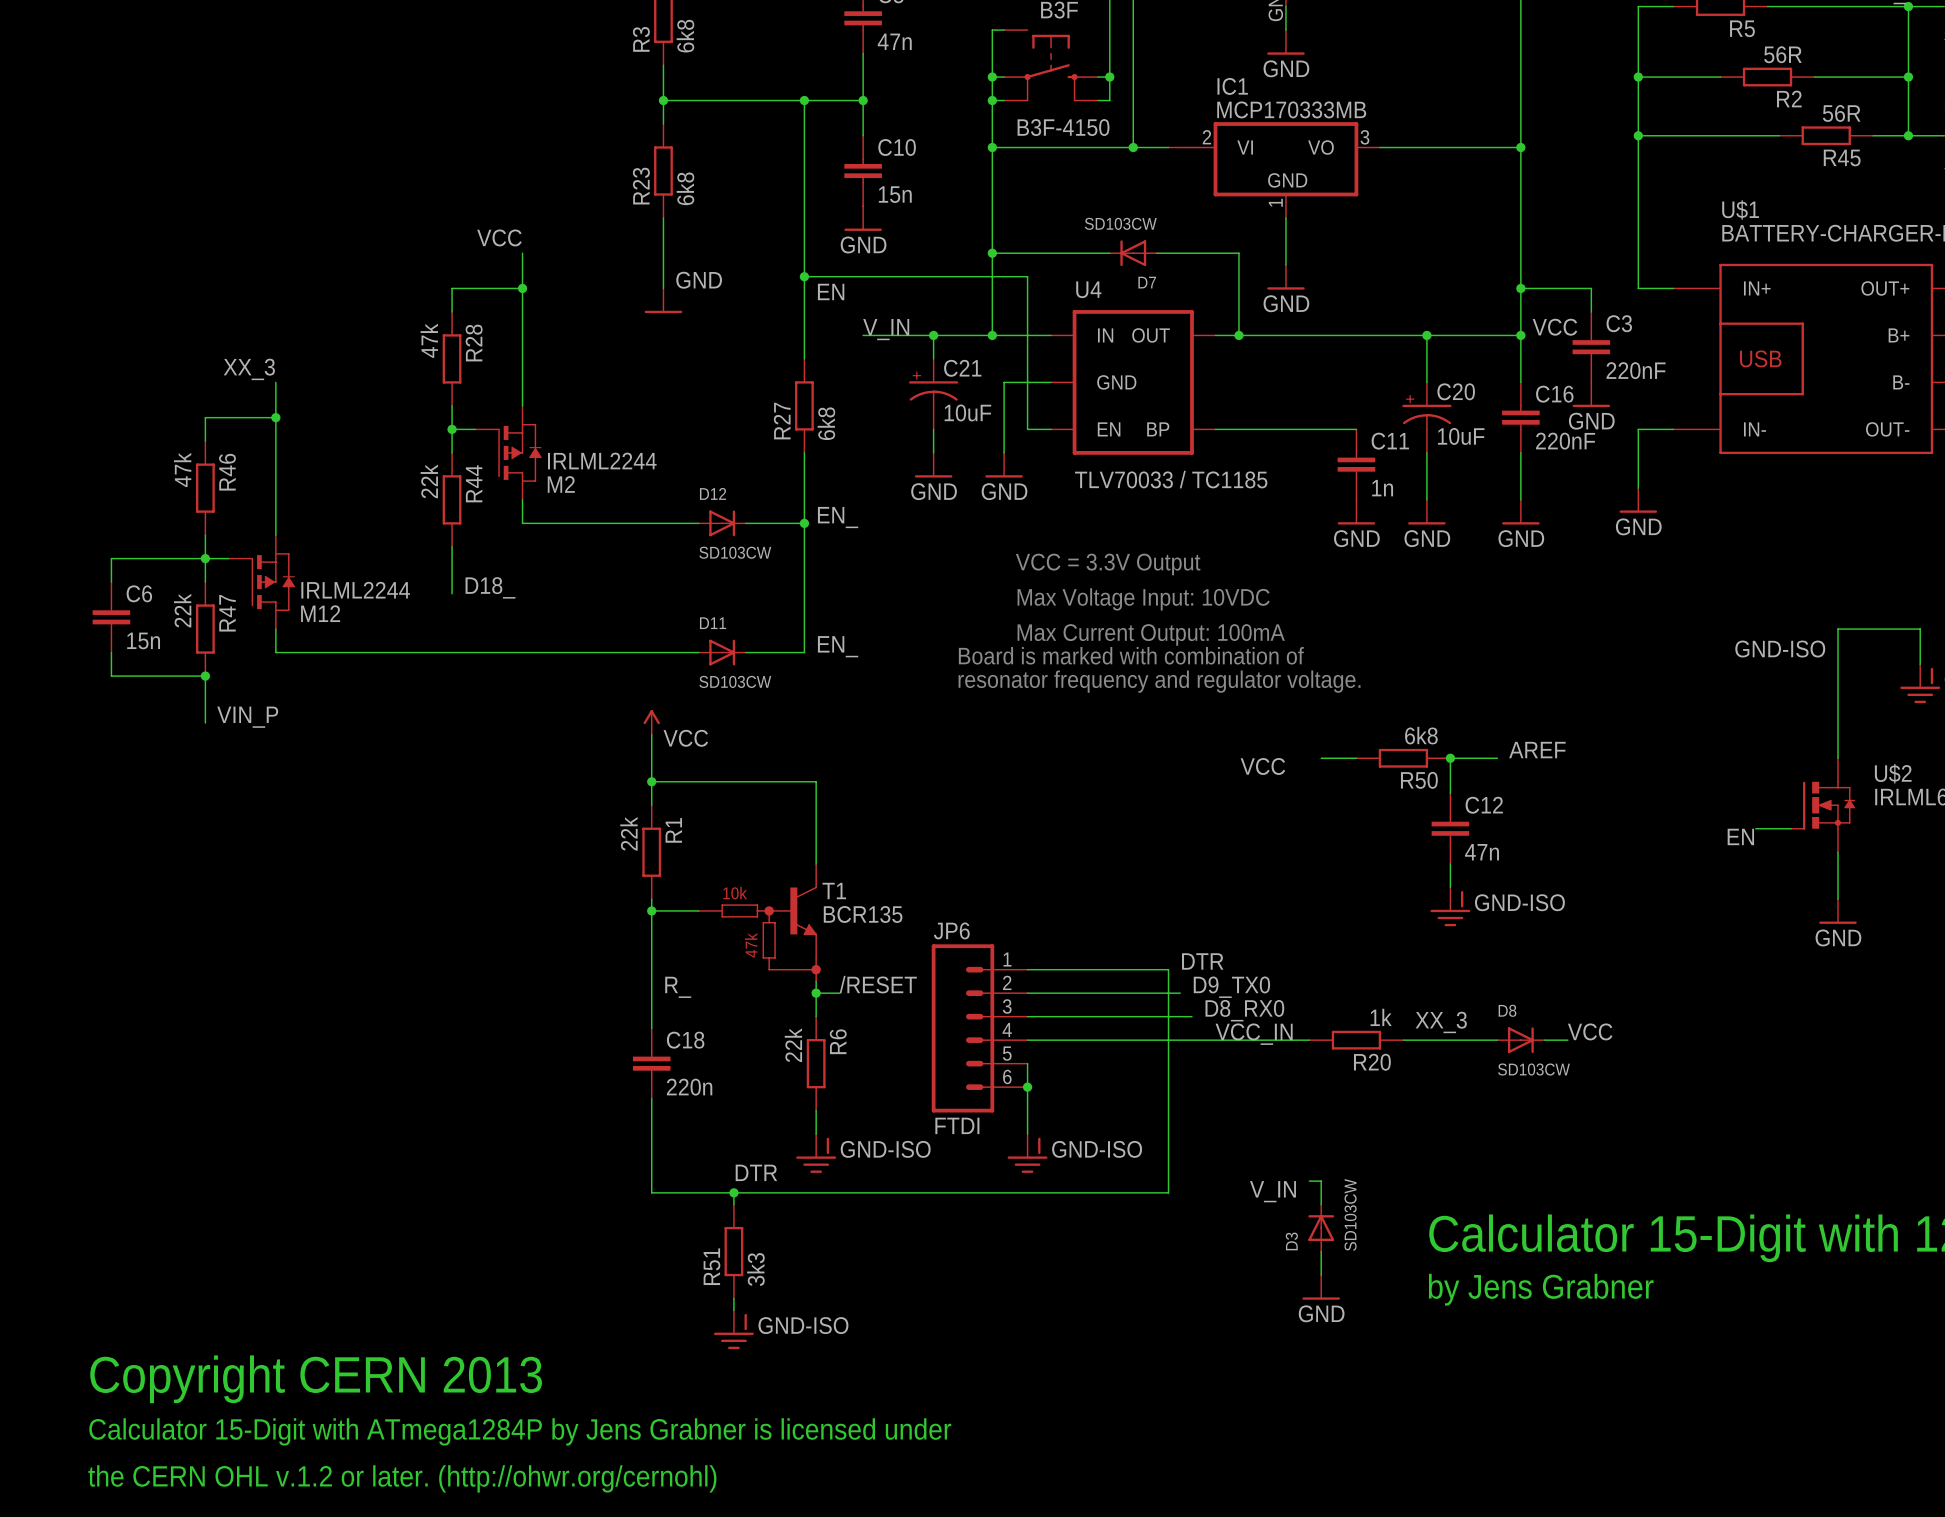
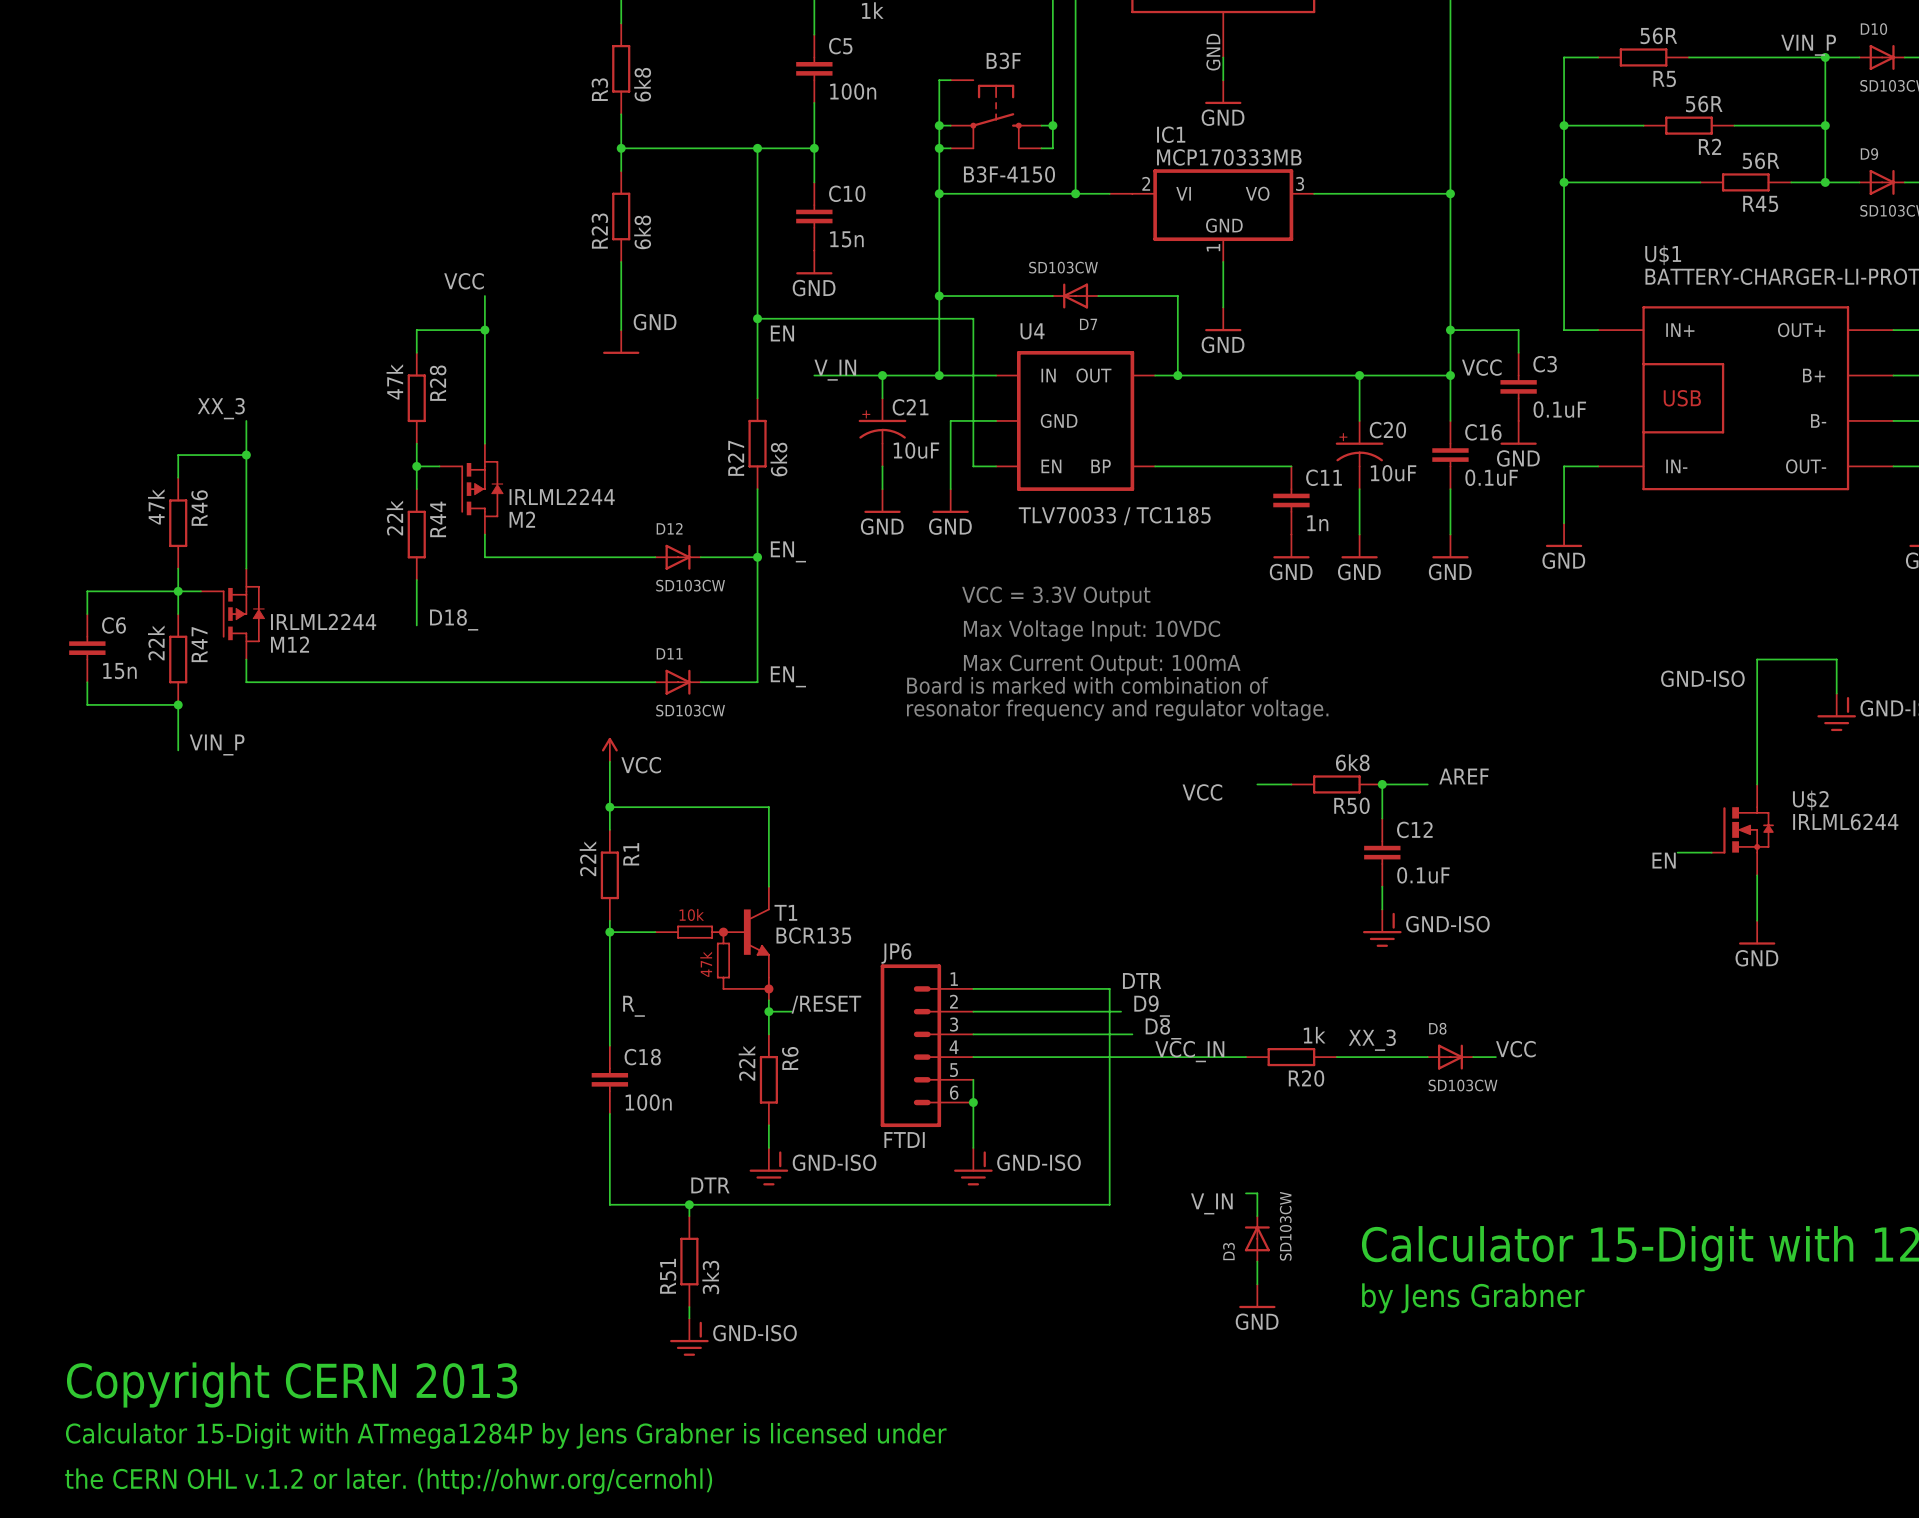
C5 value: 47n (894, 41) -> 100n (853, 91)
C3 value: 220nF (1636, 370) -> 0.1uF (1559, 409)
C16 value: 220nF (1565, 441) -> 0.1uF (1491, 477)
C12 value: 47n (1481, 852) -> 0.1uF (1423, 875)
label: D9_TX0 (1231, 987) -> D9_ (1152, 1006)
label: D8_RX0 (1244, 1010) -> D8_ (1163, 1028)
C18 value: 220n (689, 1087) -> 100n (648, 1102)

